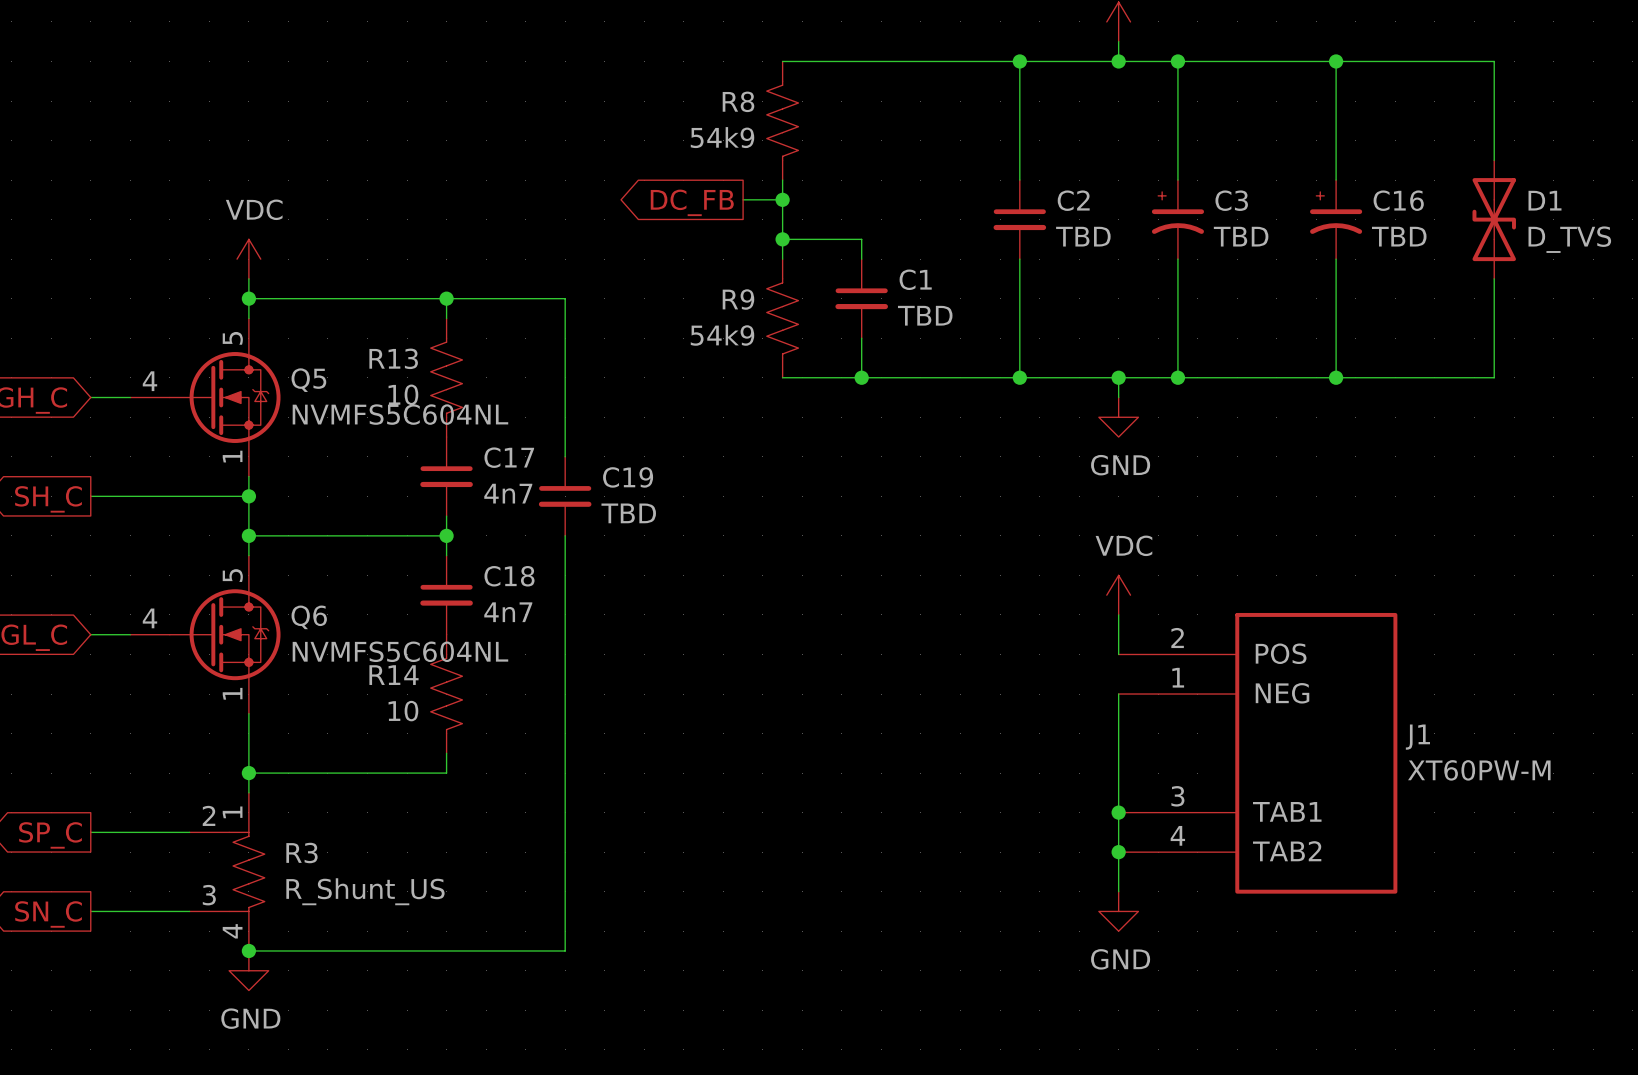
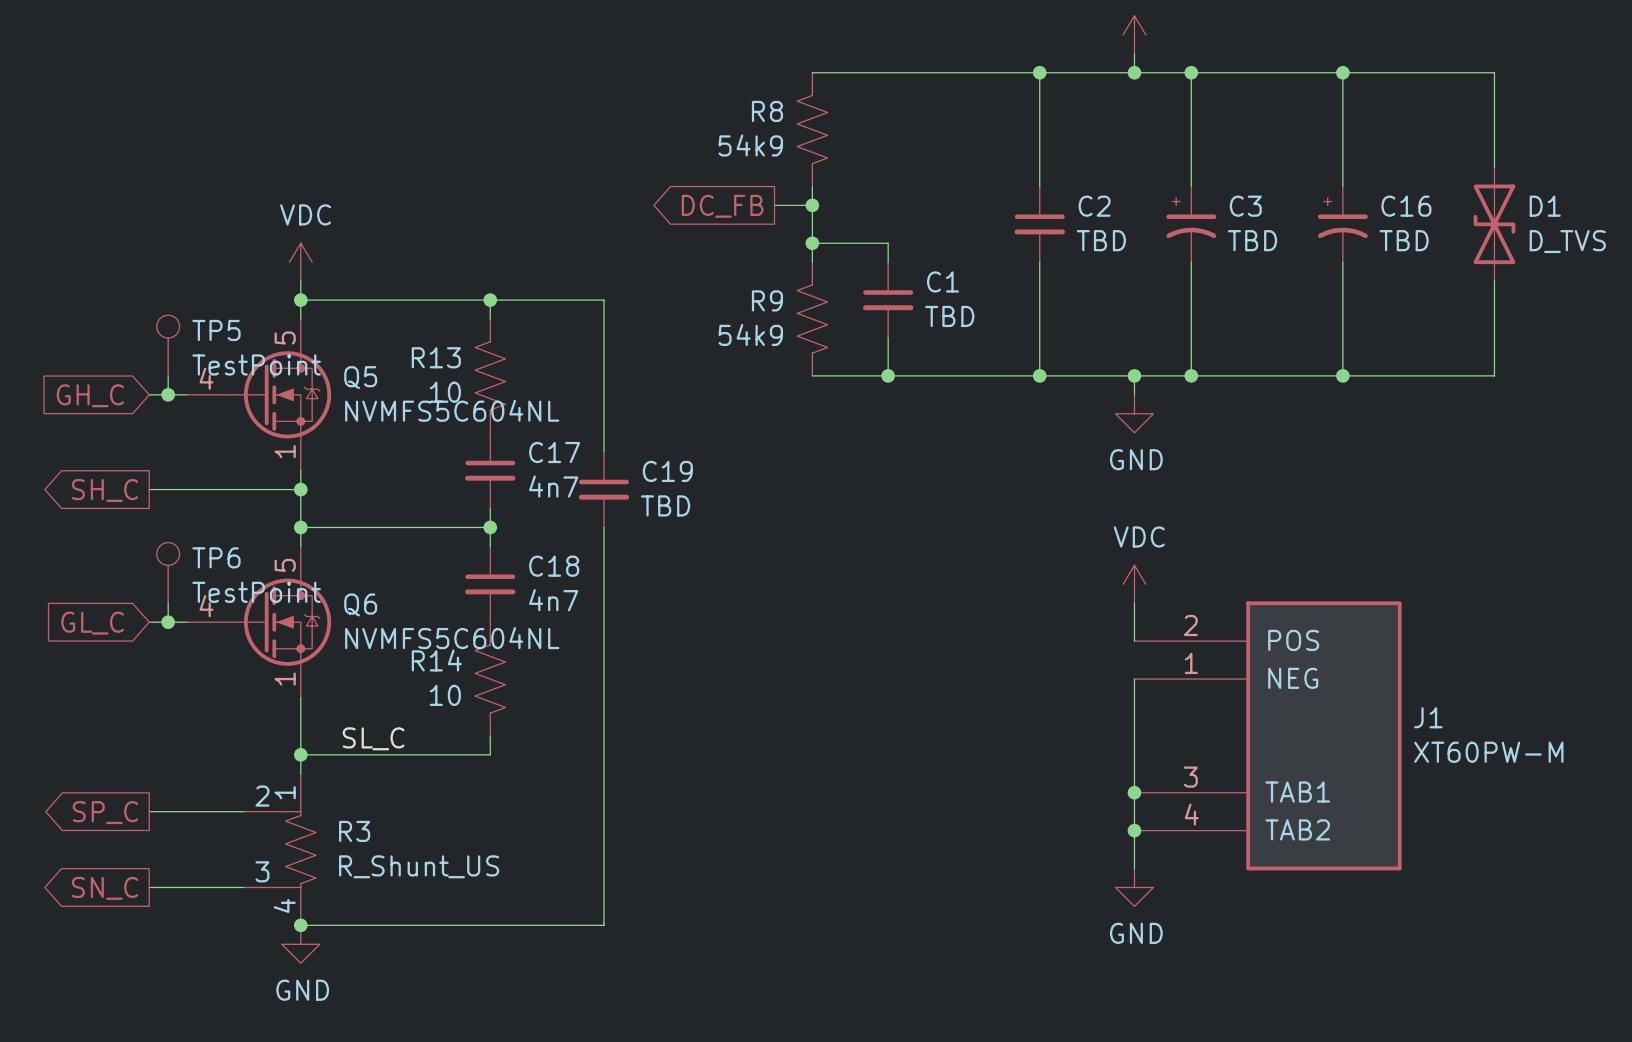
TP5: none -> TestPoint (168, 345)
wire: none -> (168, 375) (168, 394)
junction: none -> (168, 394)
TP6: none -> TestPoint (168, 572)
wire: none -> (168, 603) (168, 622)
junction: none -> (168, 622)
label: none -> SL_C (373, 738)

